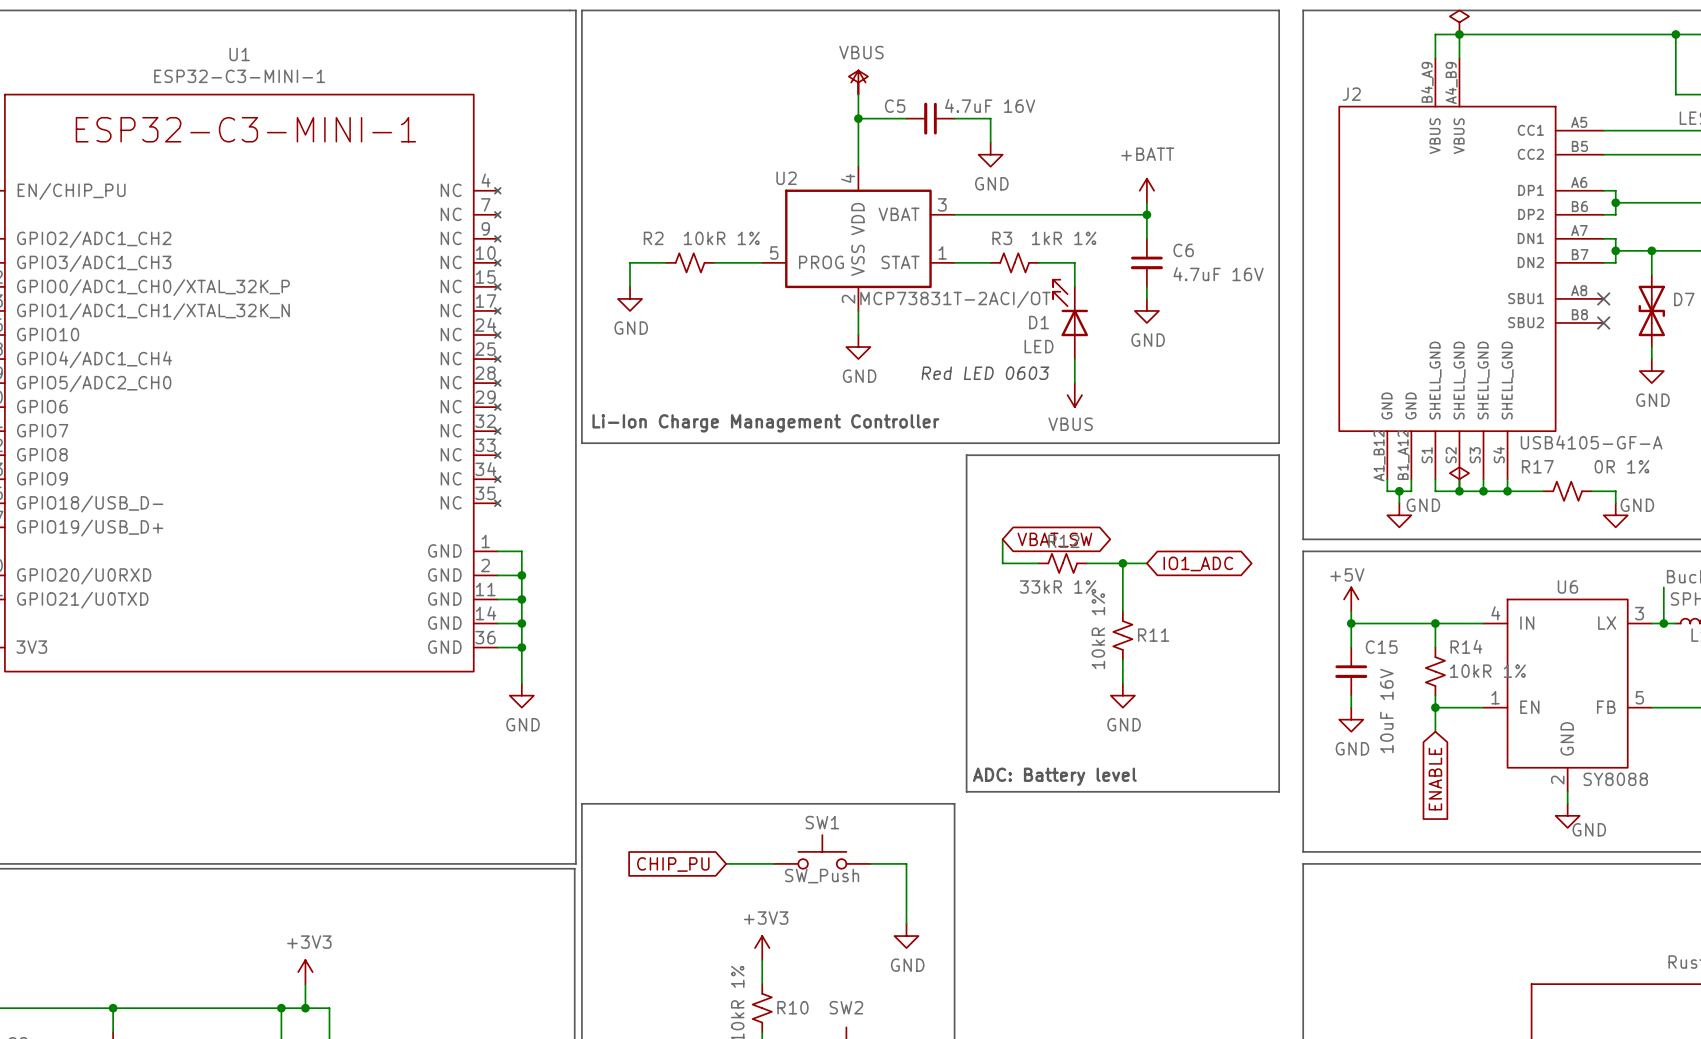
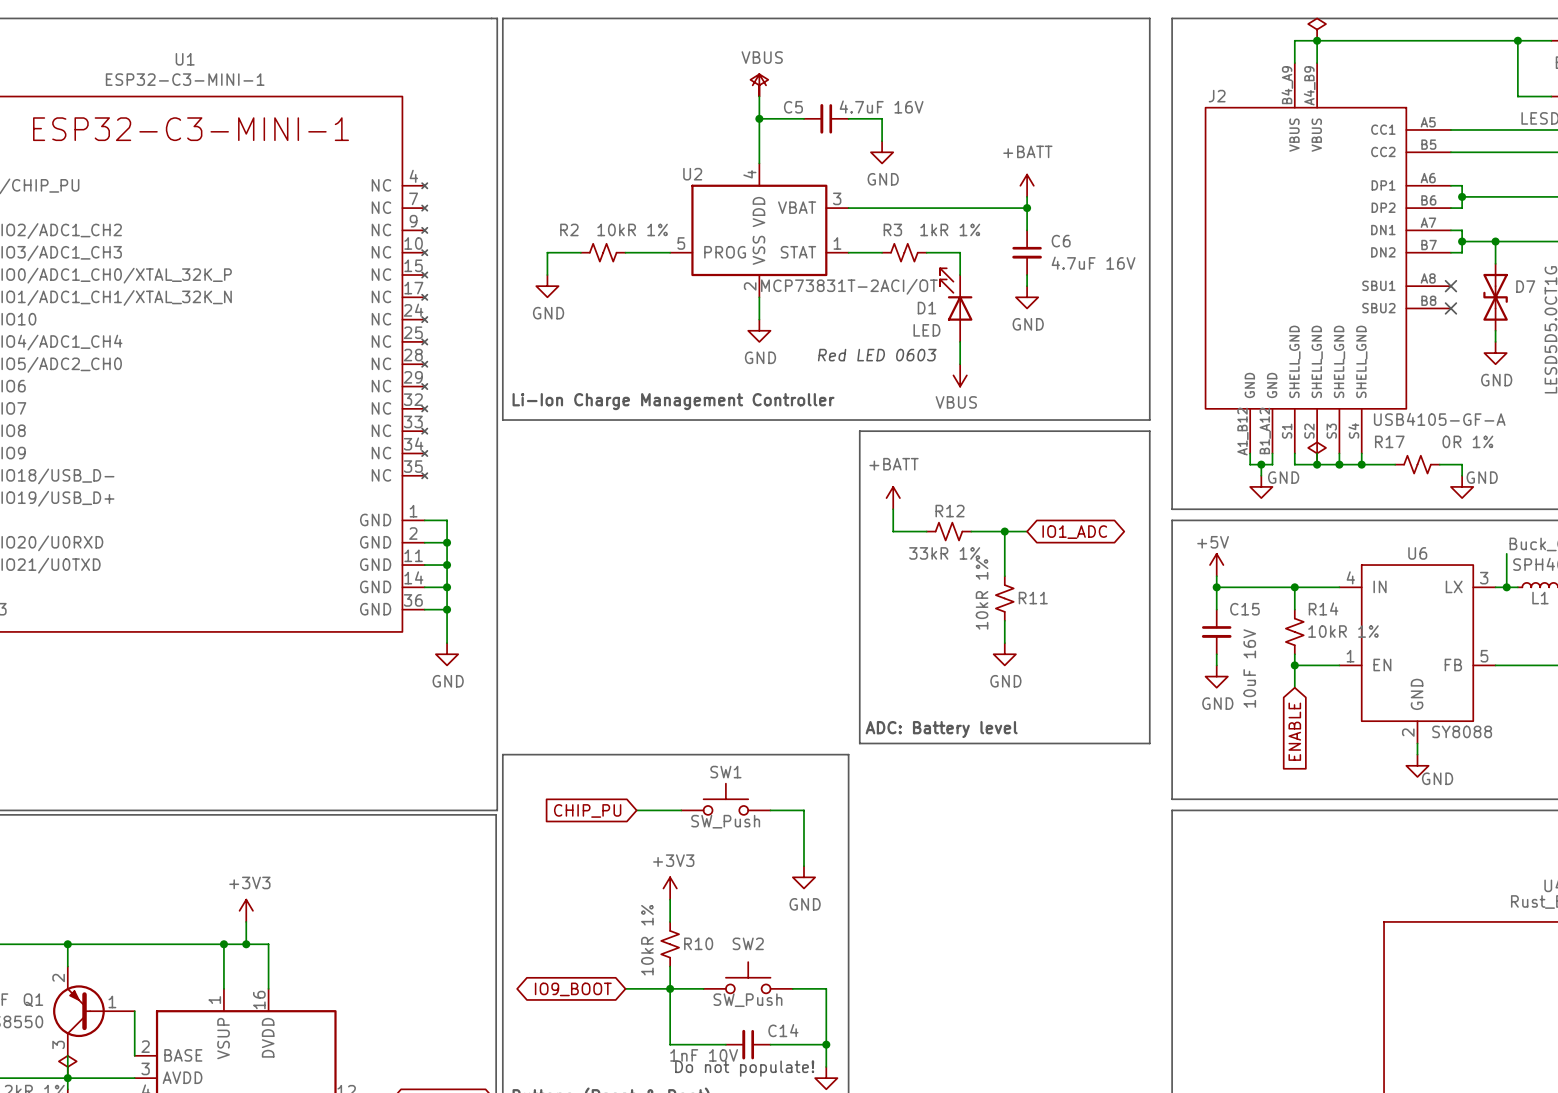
power symbol: none -> +BATT (893, 498)
global label: VBAT_SW (1054, 539) -> none

